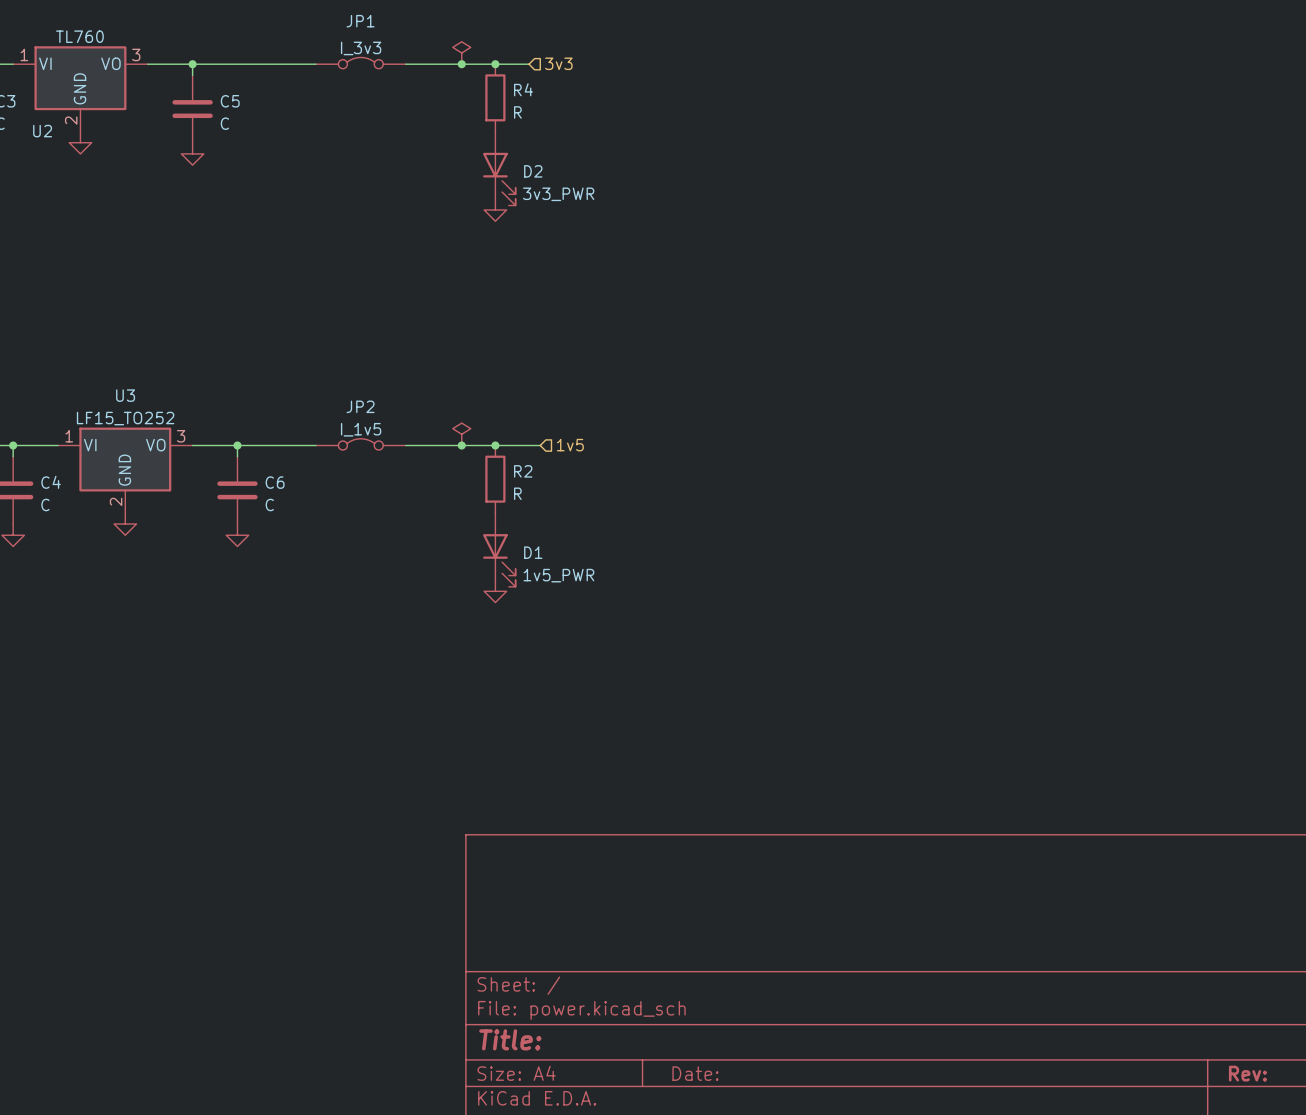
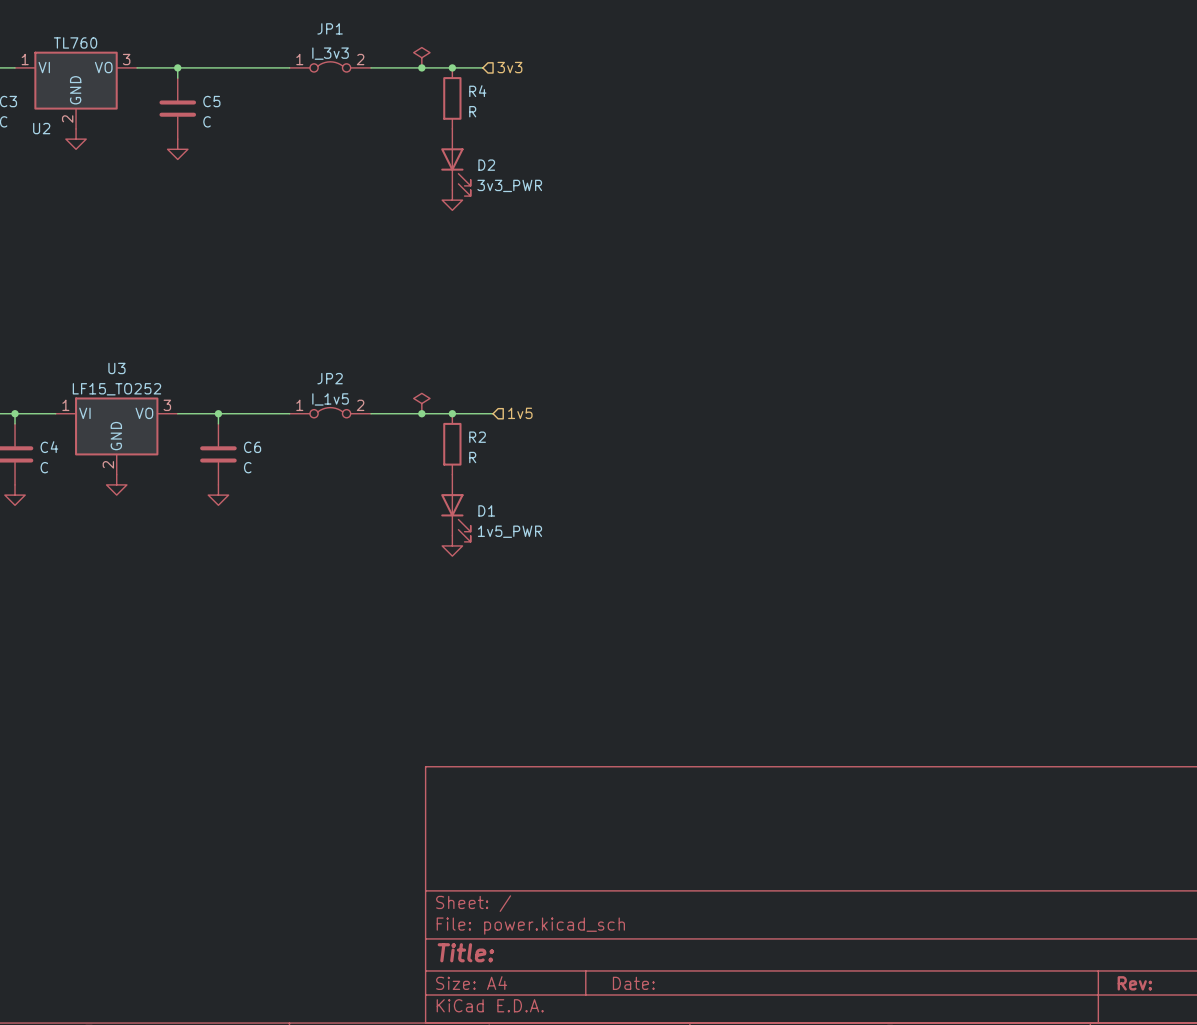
JP1 pin number: none -> 1 (299, 59)
JP1 pin number: none -> 2 (360, 59)
JP2 pin number: none -> 1 (299, 405)
JP2 pin number: none -> 2 (360, 405)

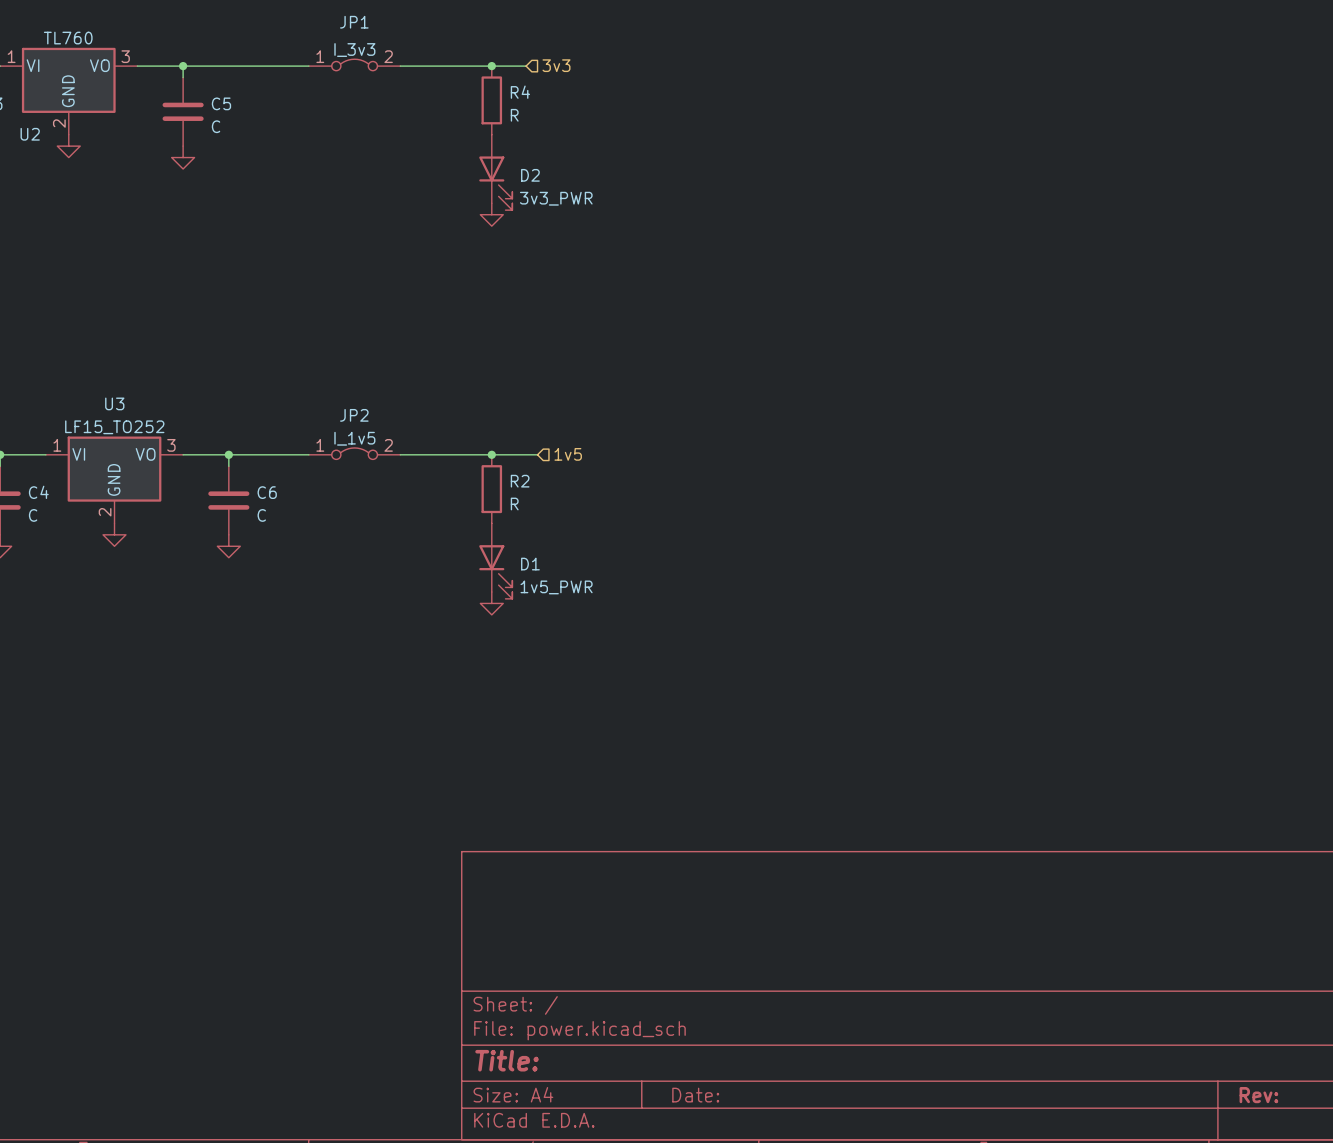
power symbol: (421, 57) -> none
junction: (421, 67) -> none
power symbol: (421, 403) -> none
junction: (421, 413) -> none

